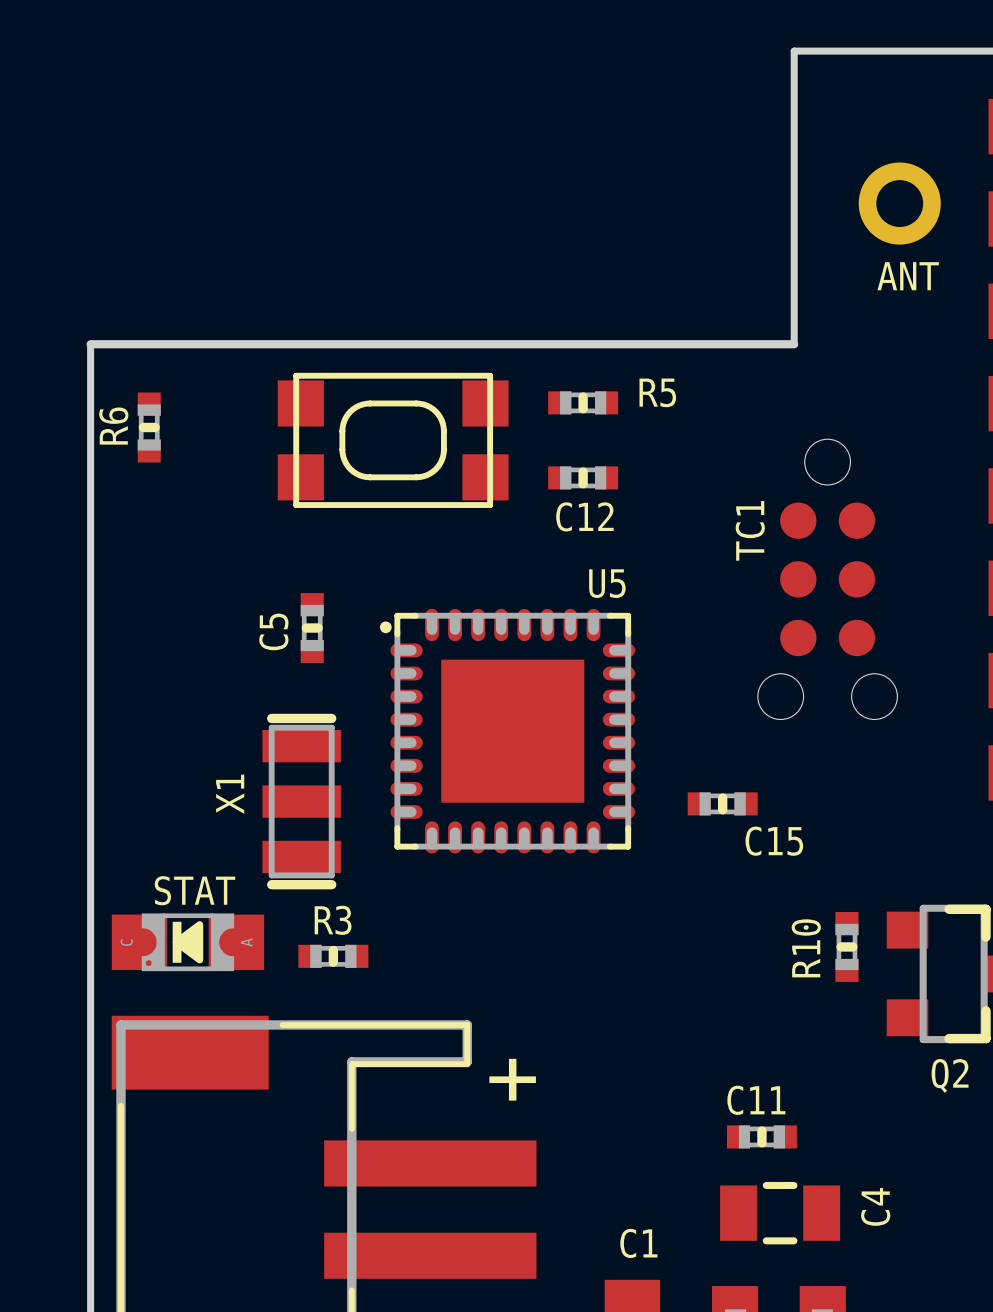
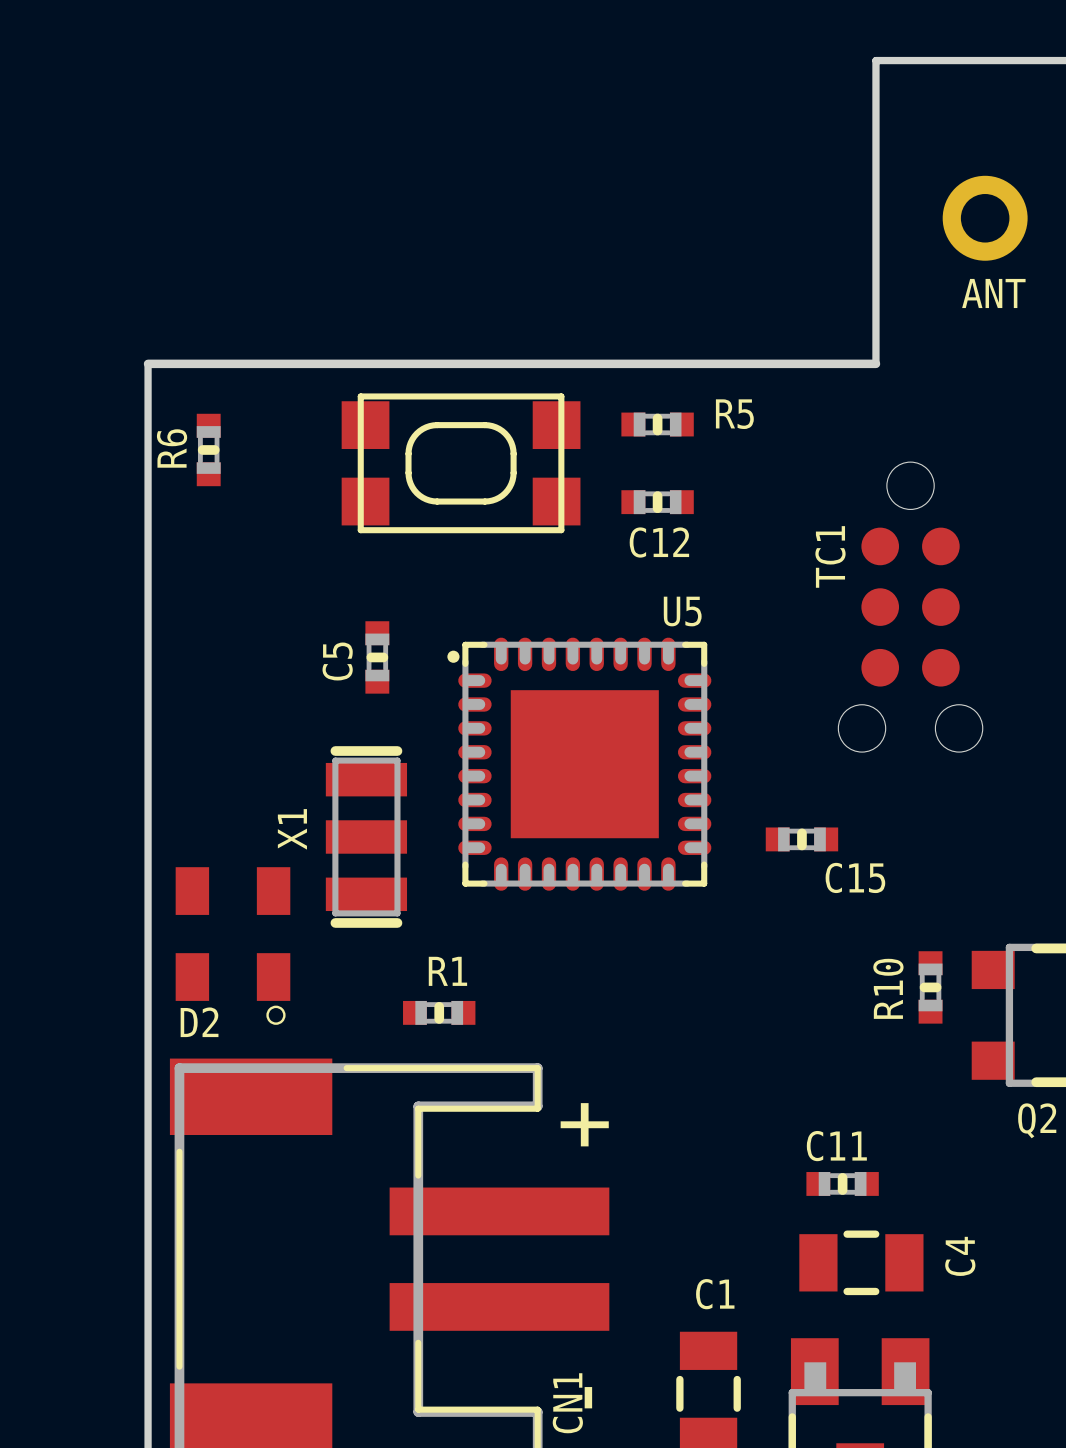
D2: none -> (232, 946)
R3 name: R3 (333, 920) -> R1 (447, 971)
STAT: (187, 942) -> none
R3 position: (333, 956) -> (439, 1012)

